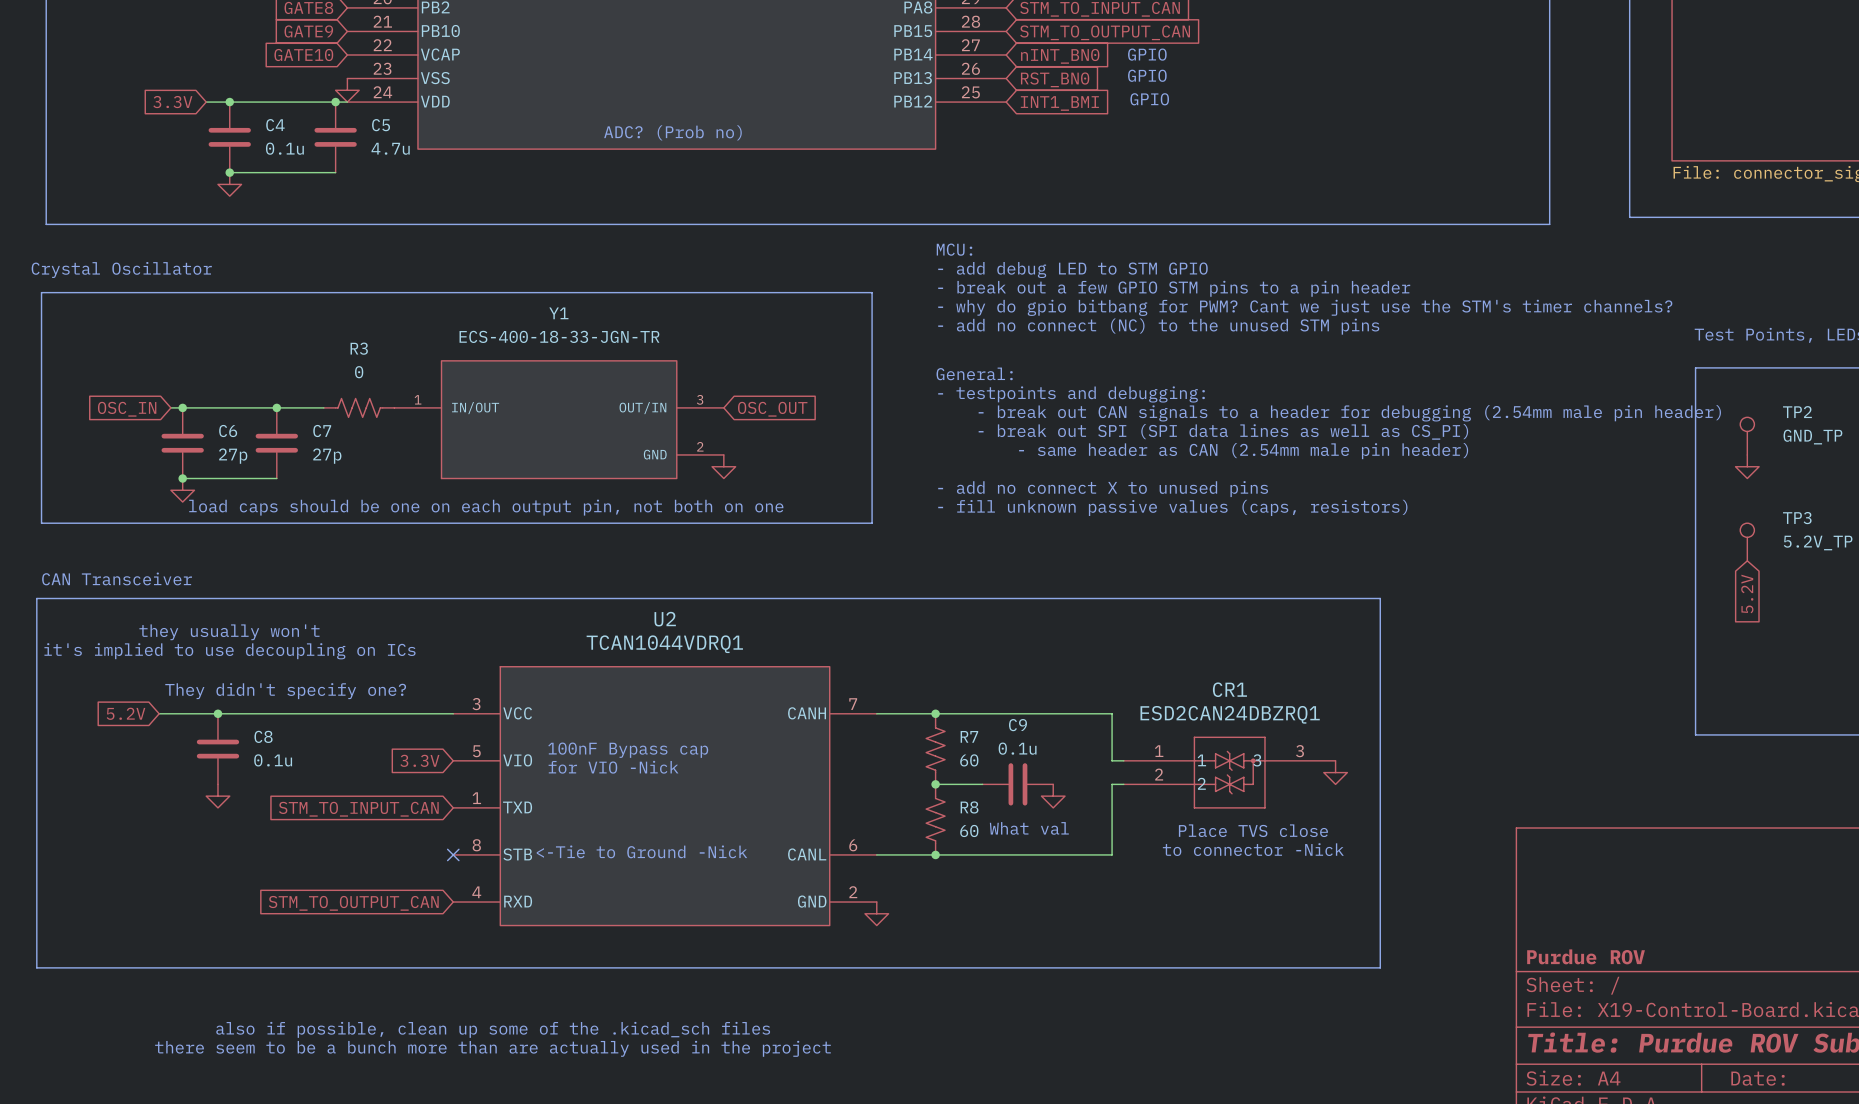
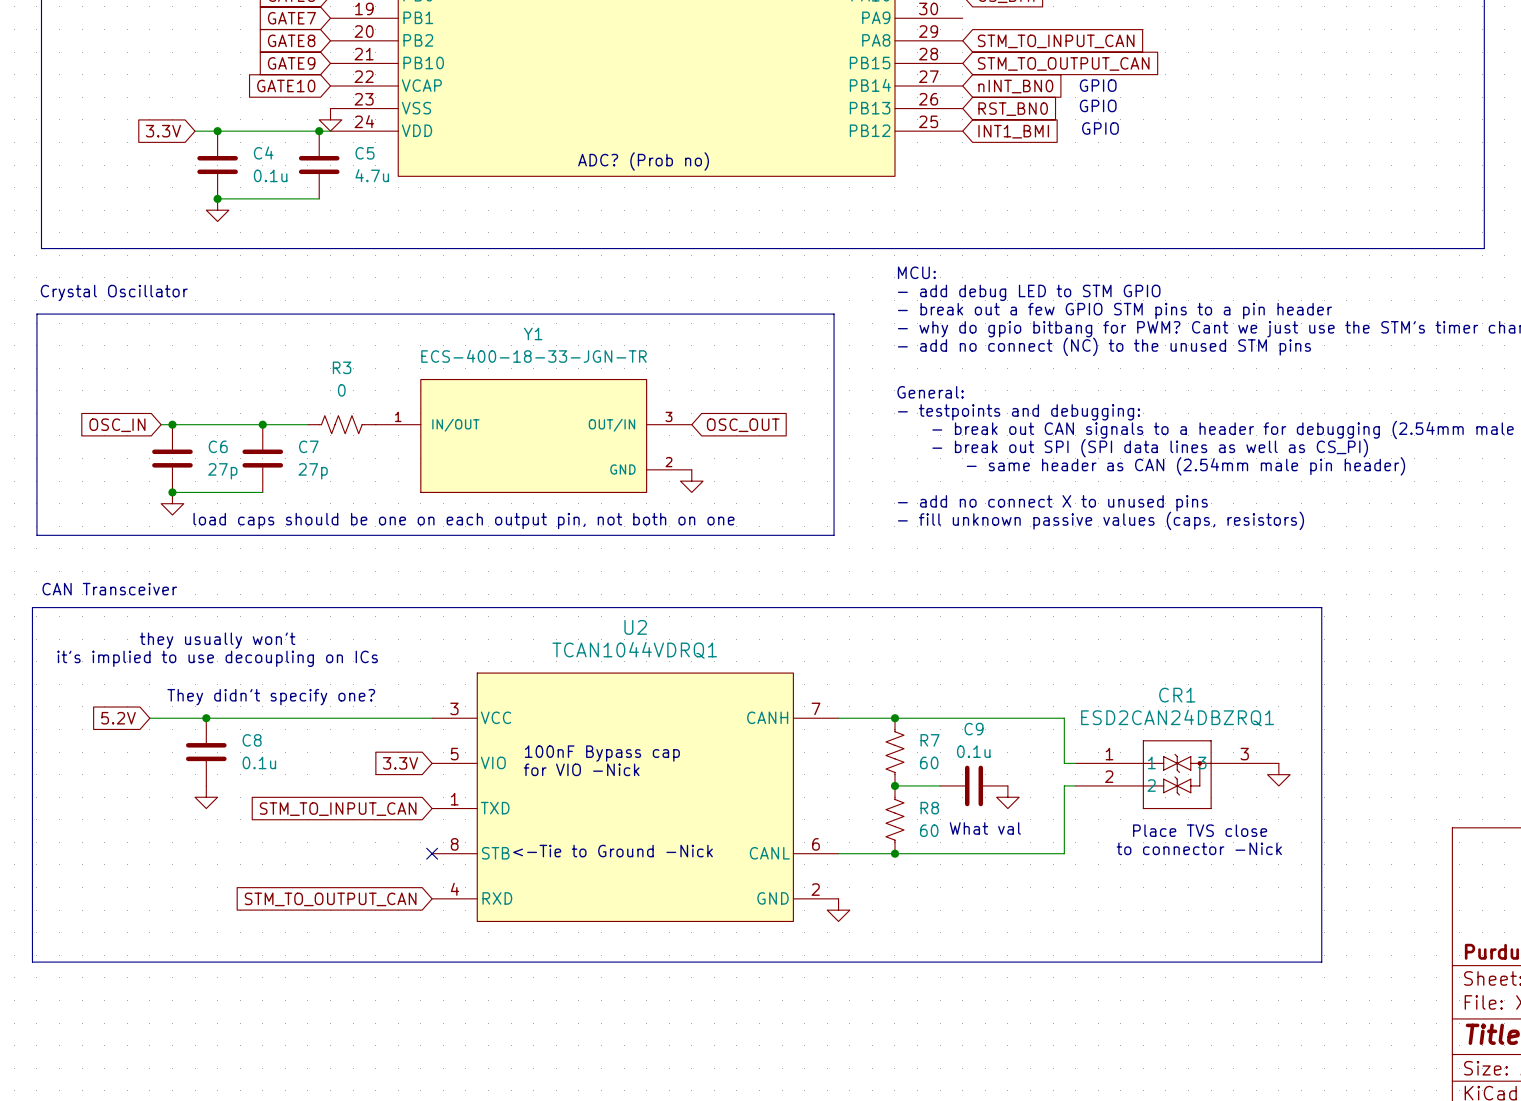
text: also if possible, clean up some of the .kicad_sch files (493, 1029) -> none
text: there seem to be a bunch more than are actually used in the project (492, 1048) -> none

